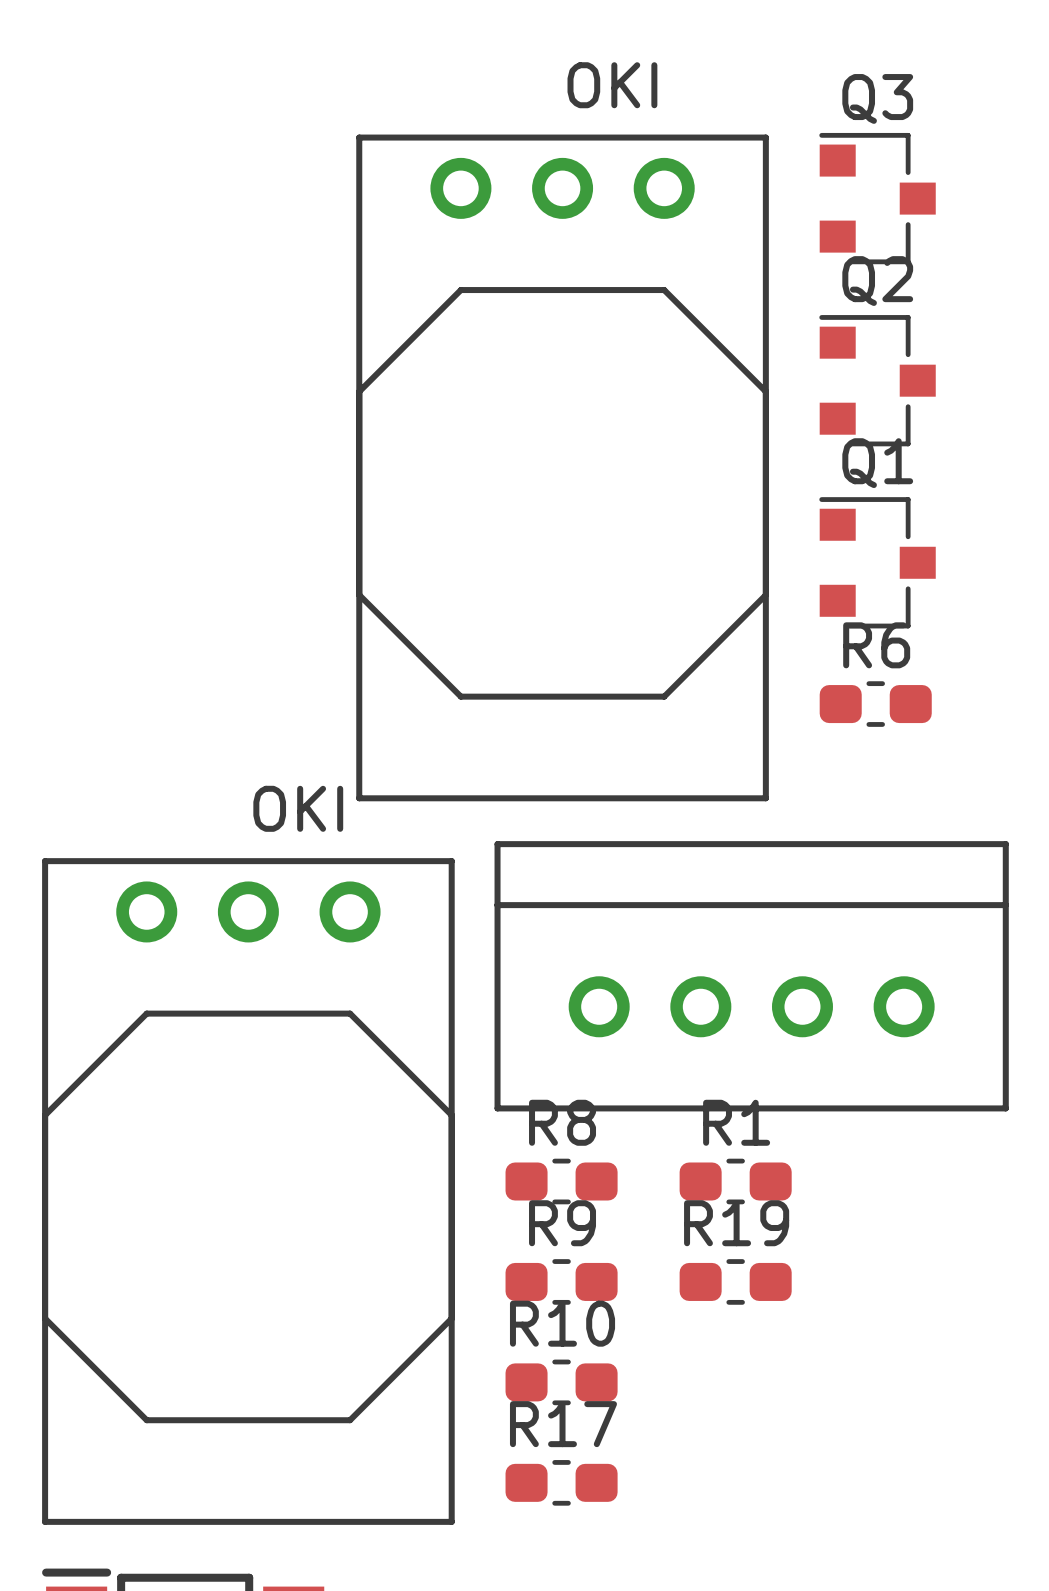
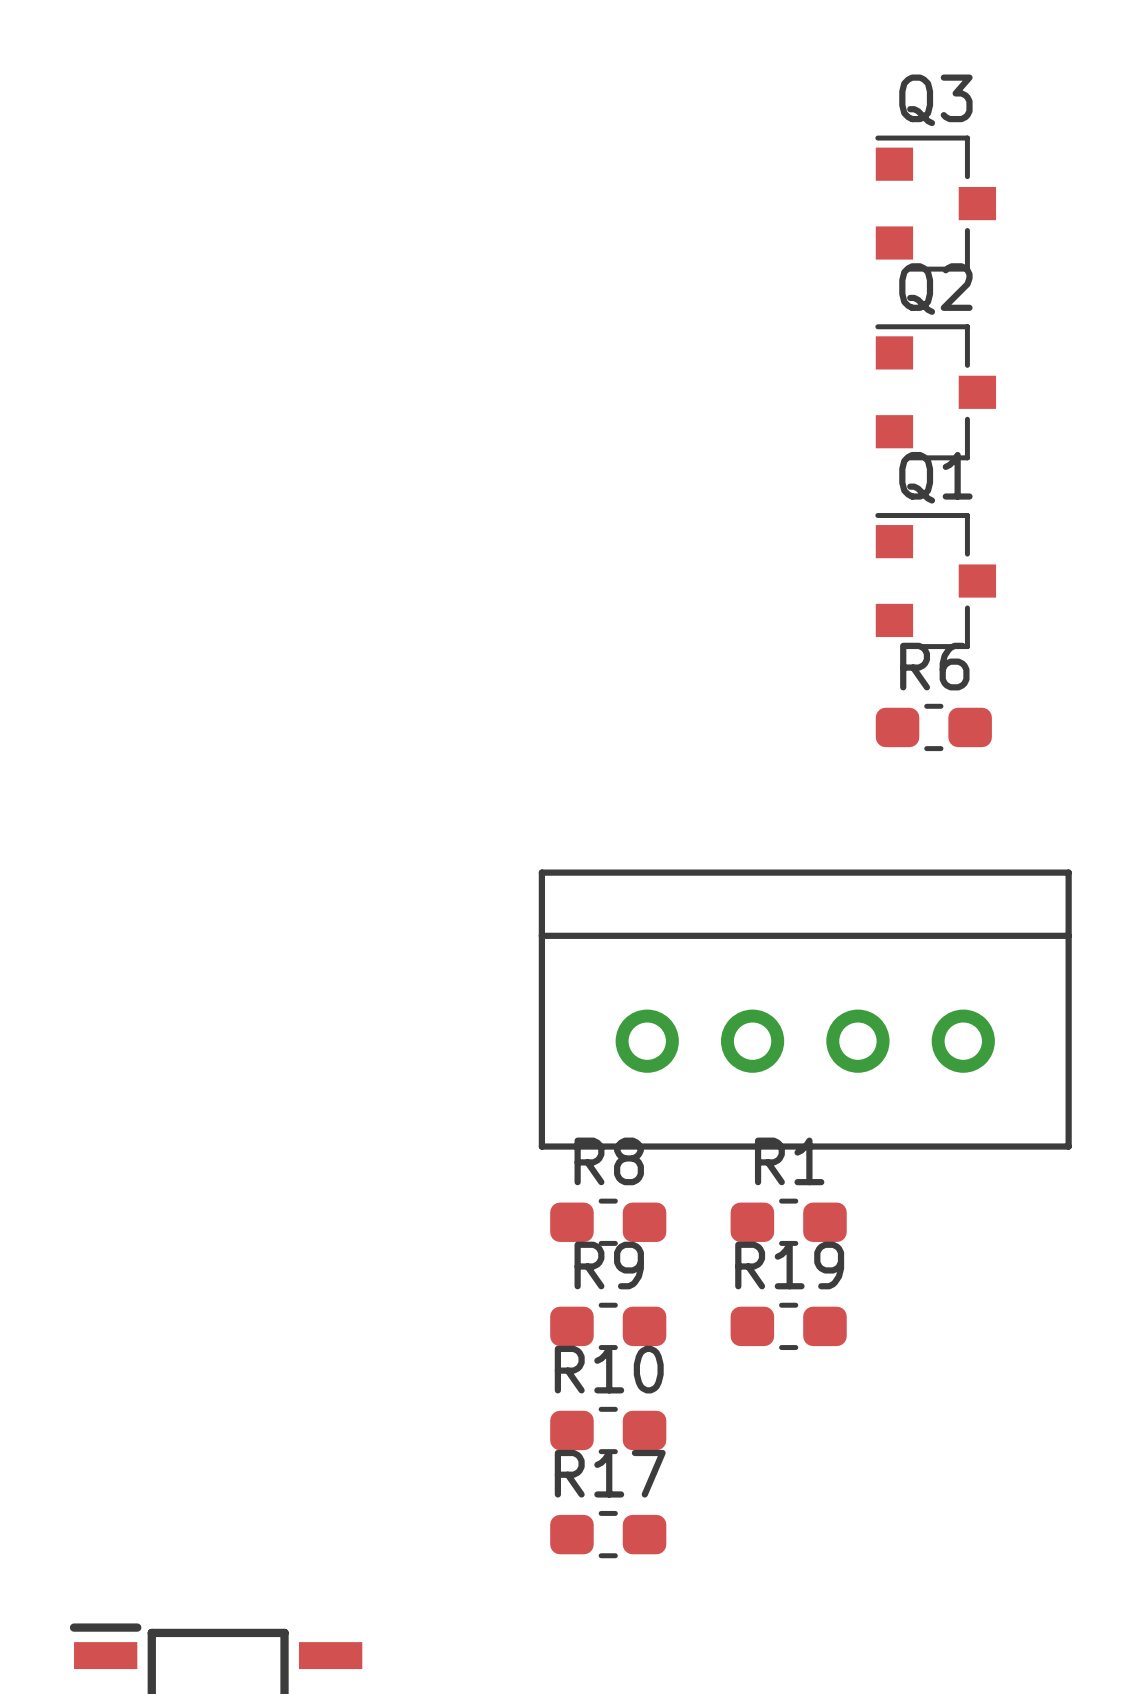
part: OKI (562, 467) -> none
part: OKI (248, 1191) -> none

